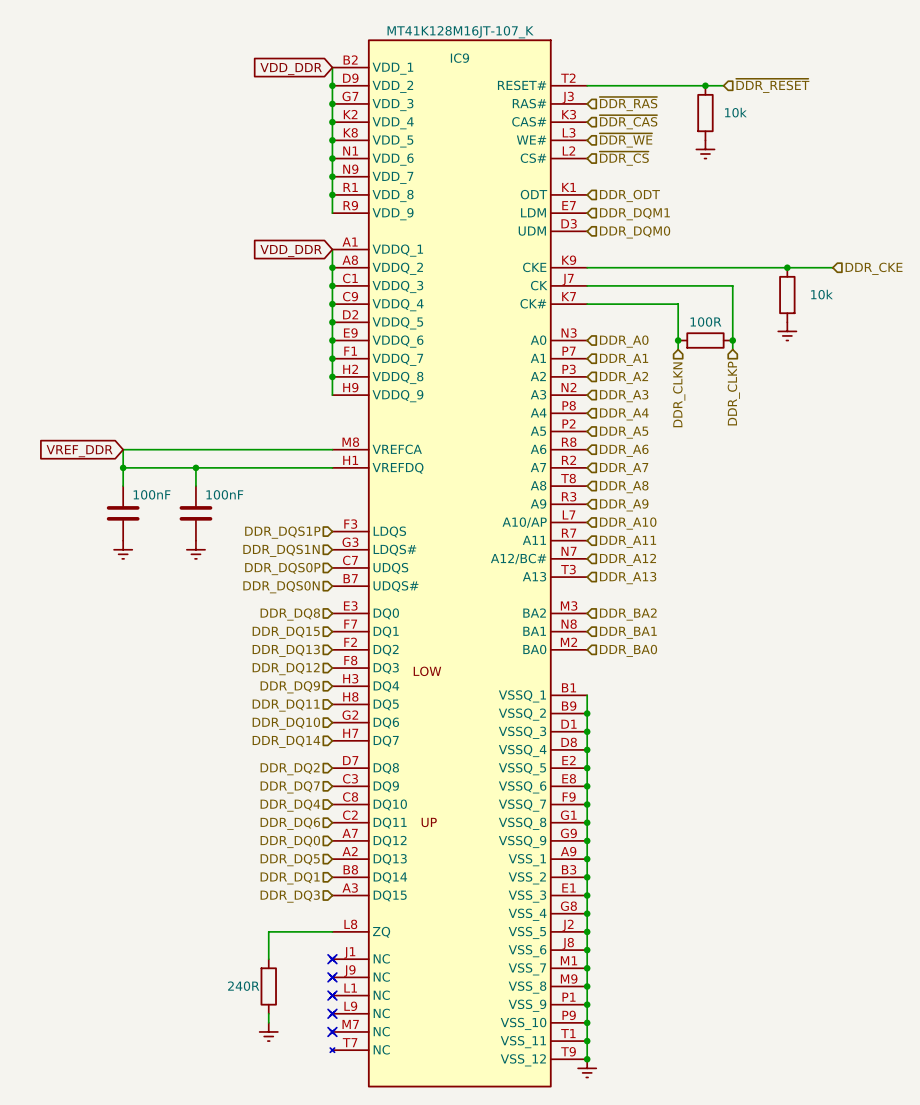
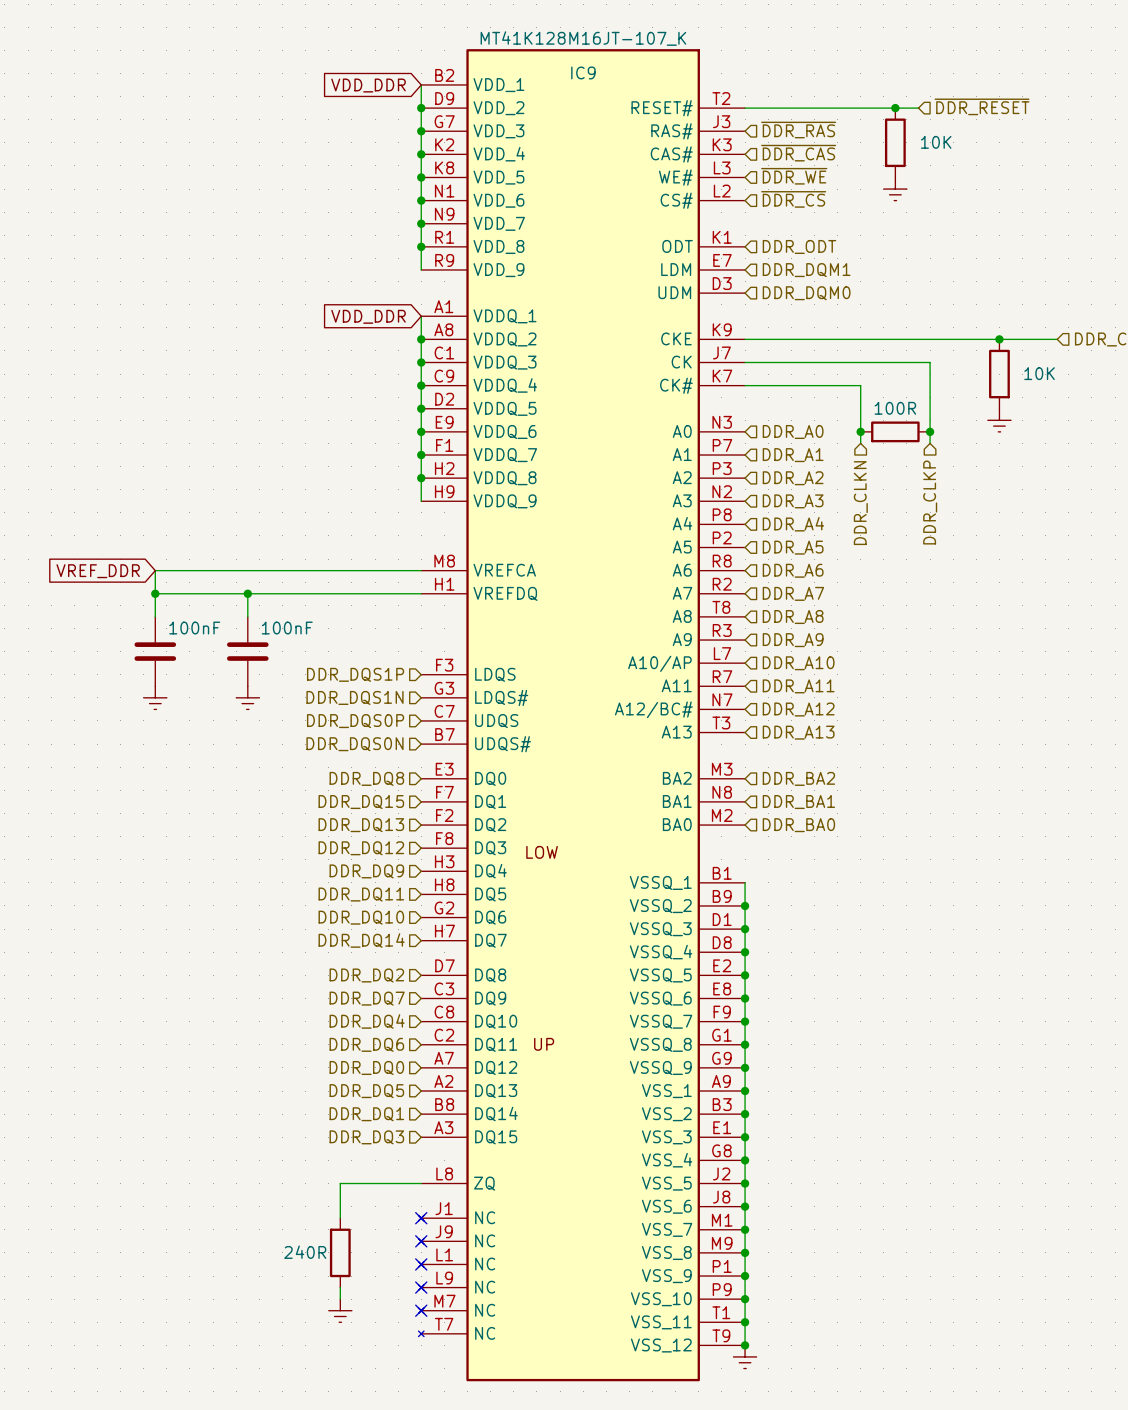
part value: 10k (735, 112) -> 10K (936, 142)
part value: 10k (821, 294) -> 10K (1039, 373)

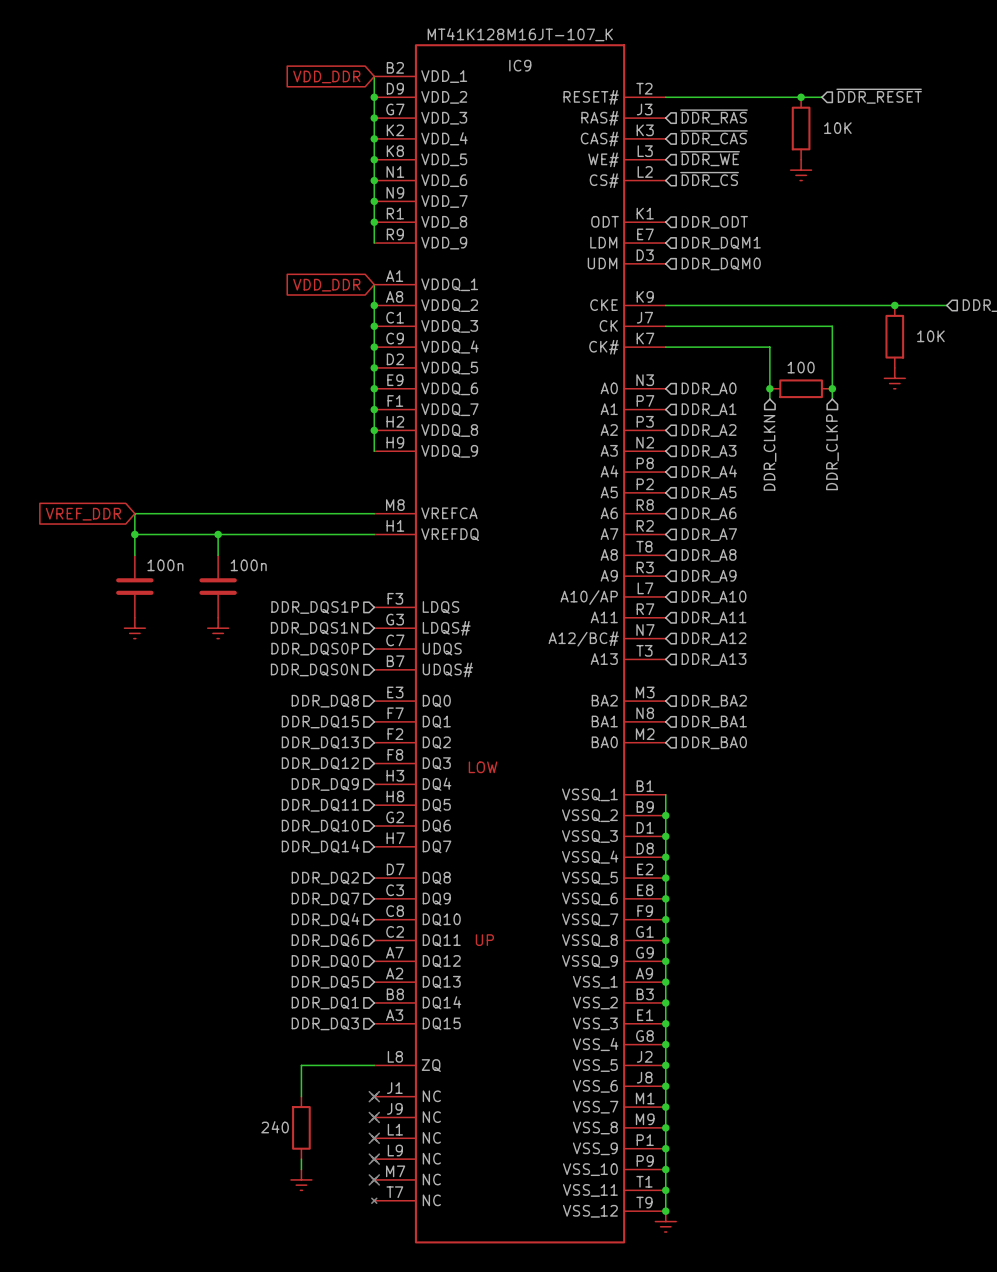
part value: 100R (895, 408) -> 100 (801, 367)
part value: 100nF (194, 628) -> 100n (165, 565)
part value: 100nF (287, 628) -> 100n (248, 565)
part value: 240R (305, 1252) -> 240 (275, 1127)

